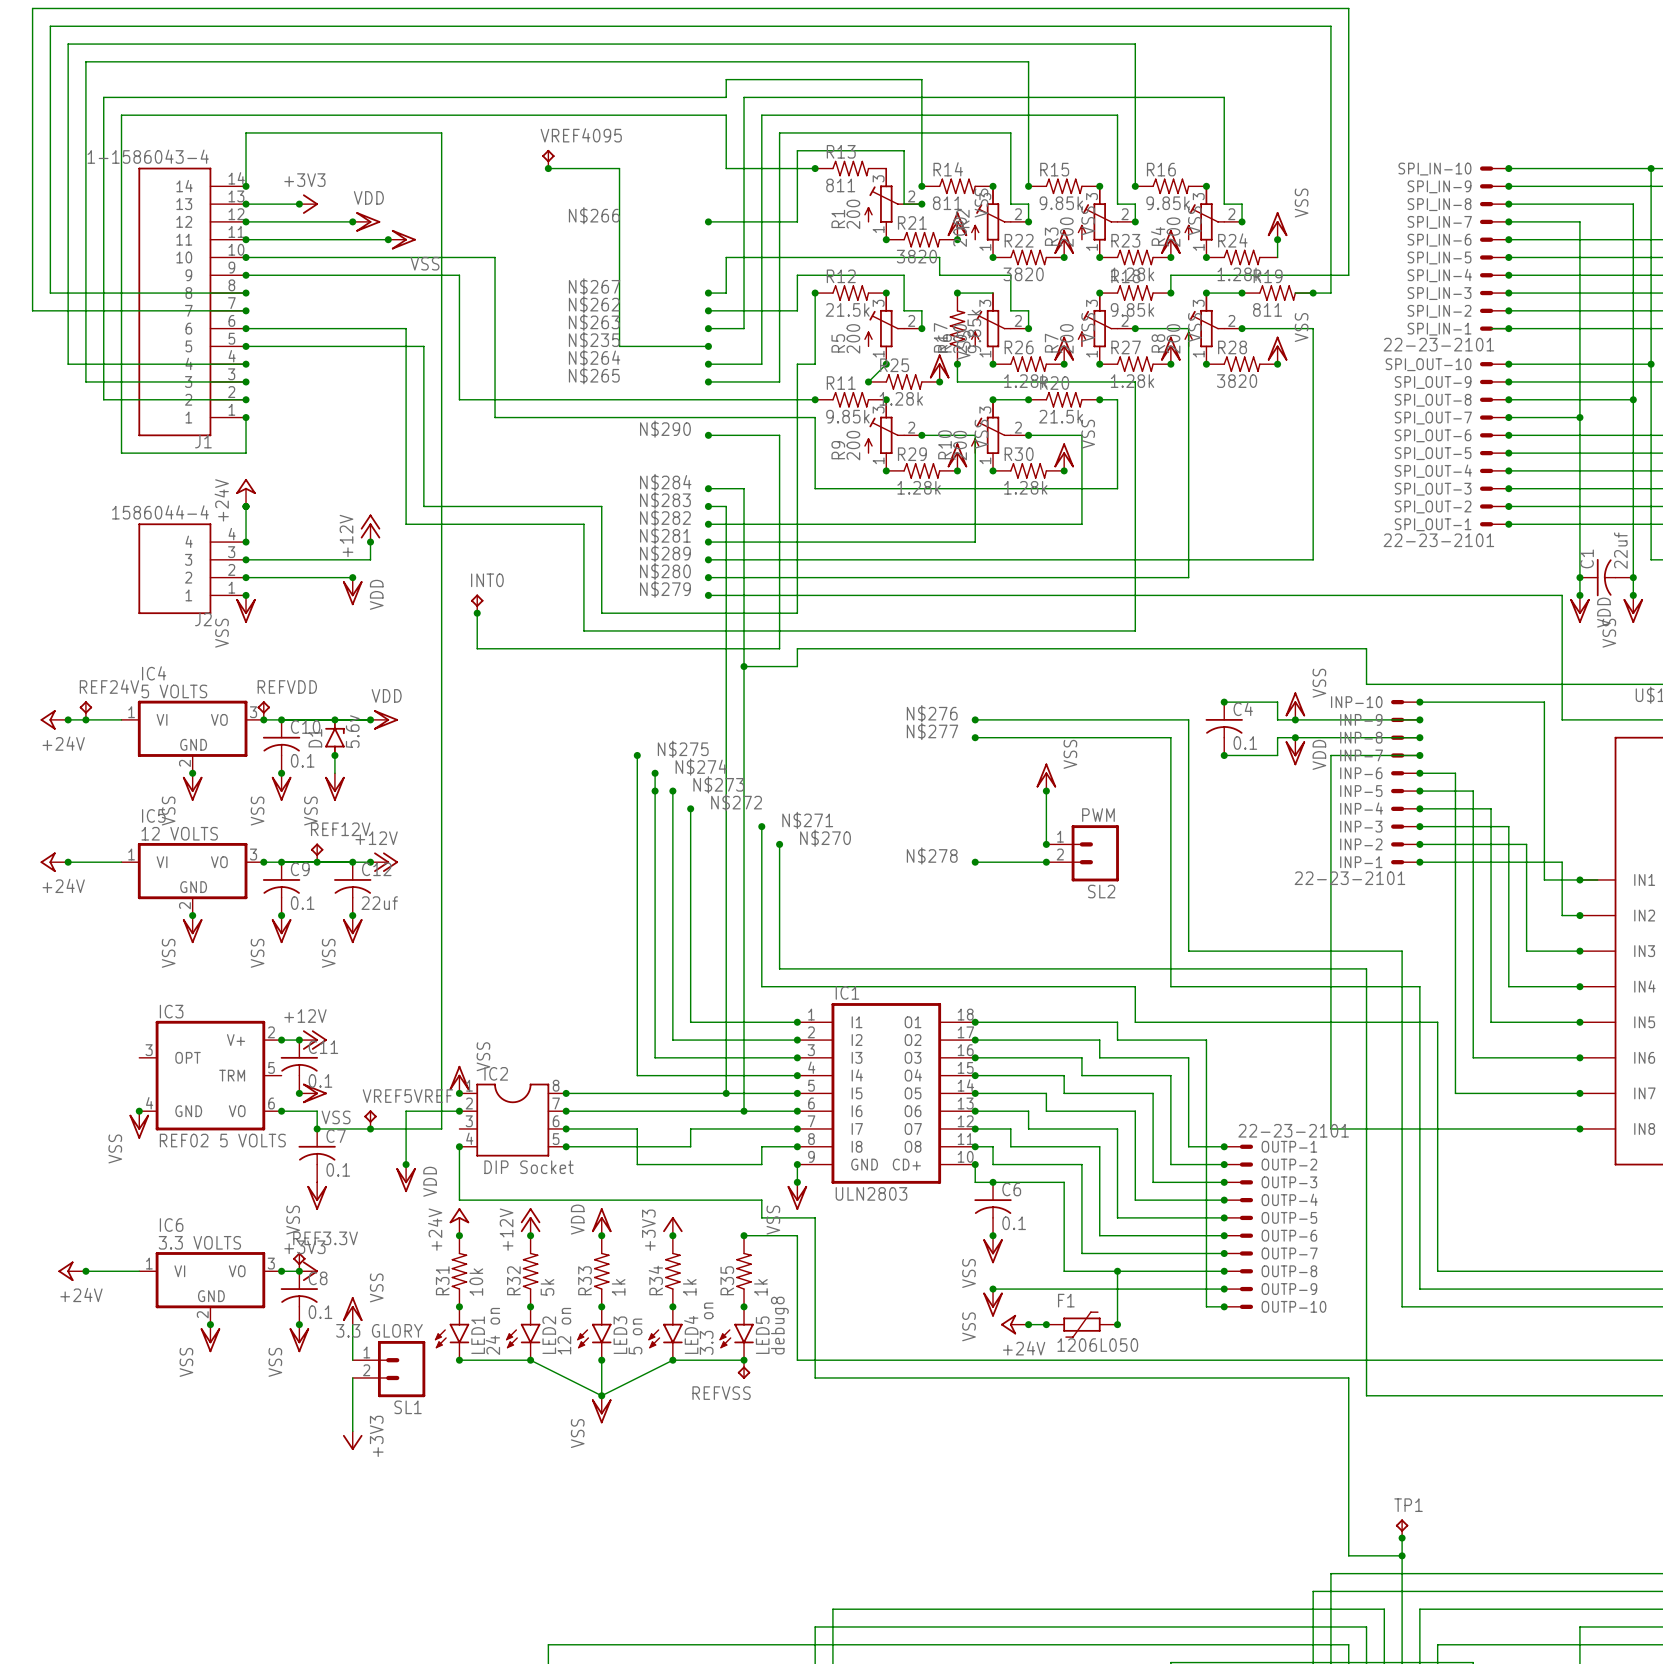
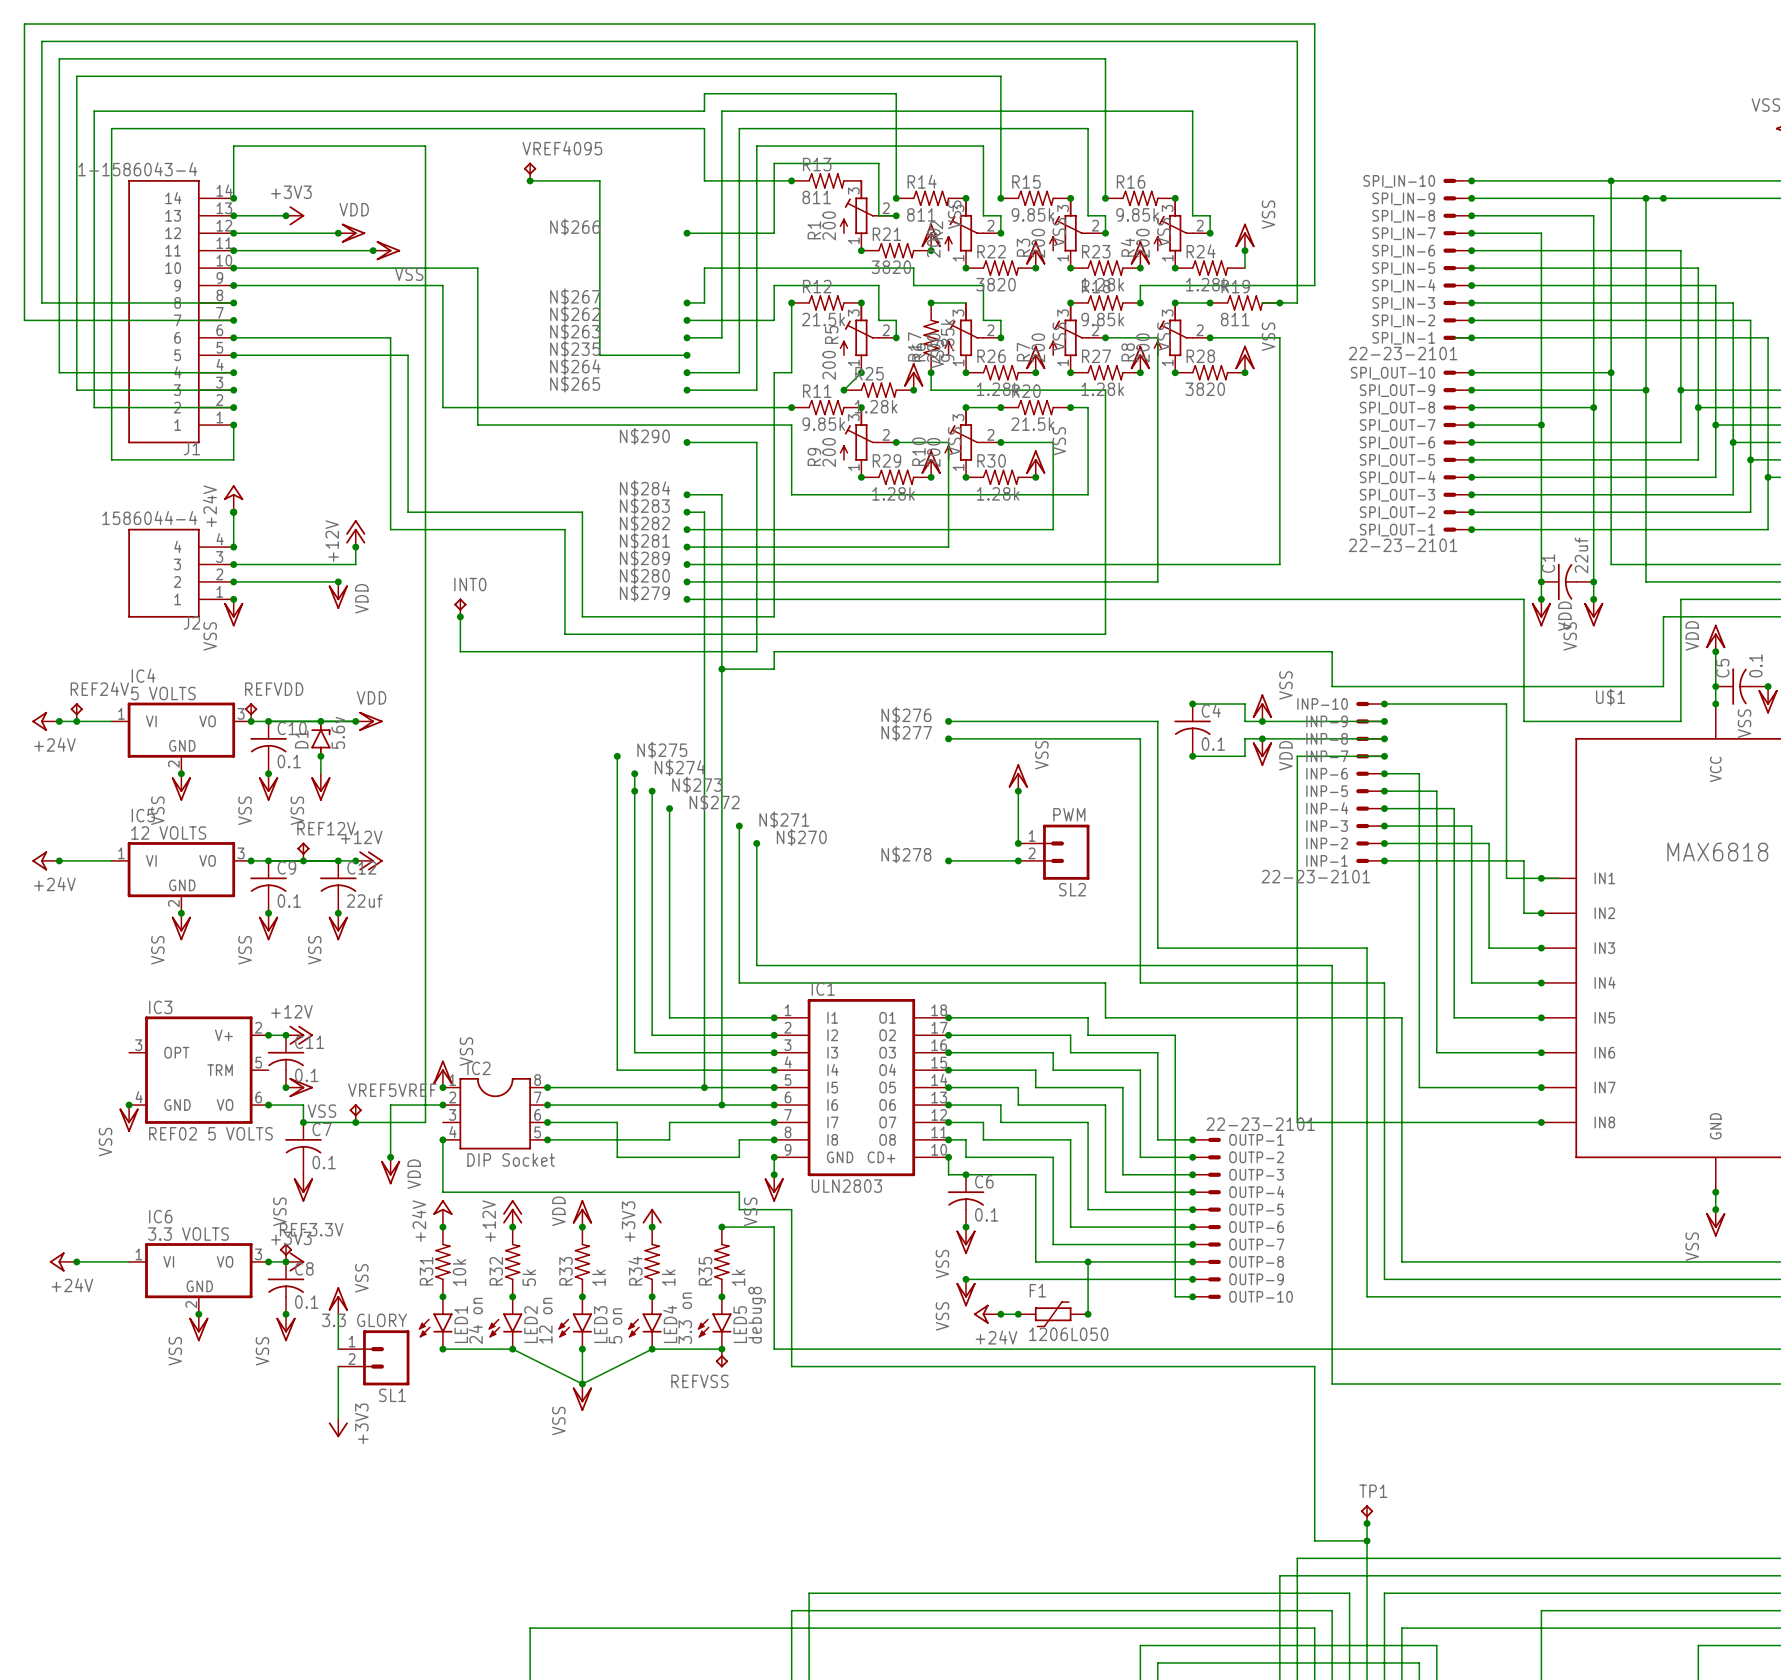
R5 value position: 200 (853, 338) -> 200 (829, 365)
R5 name position: R5 (838, 343) -> R5 (831, 334)

